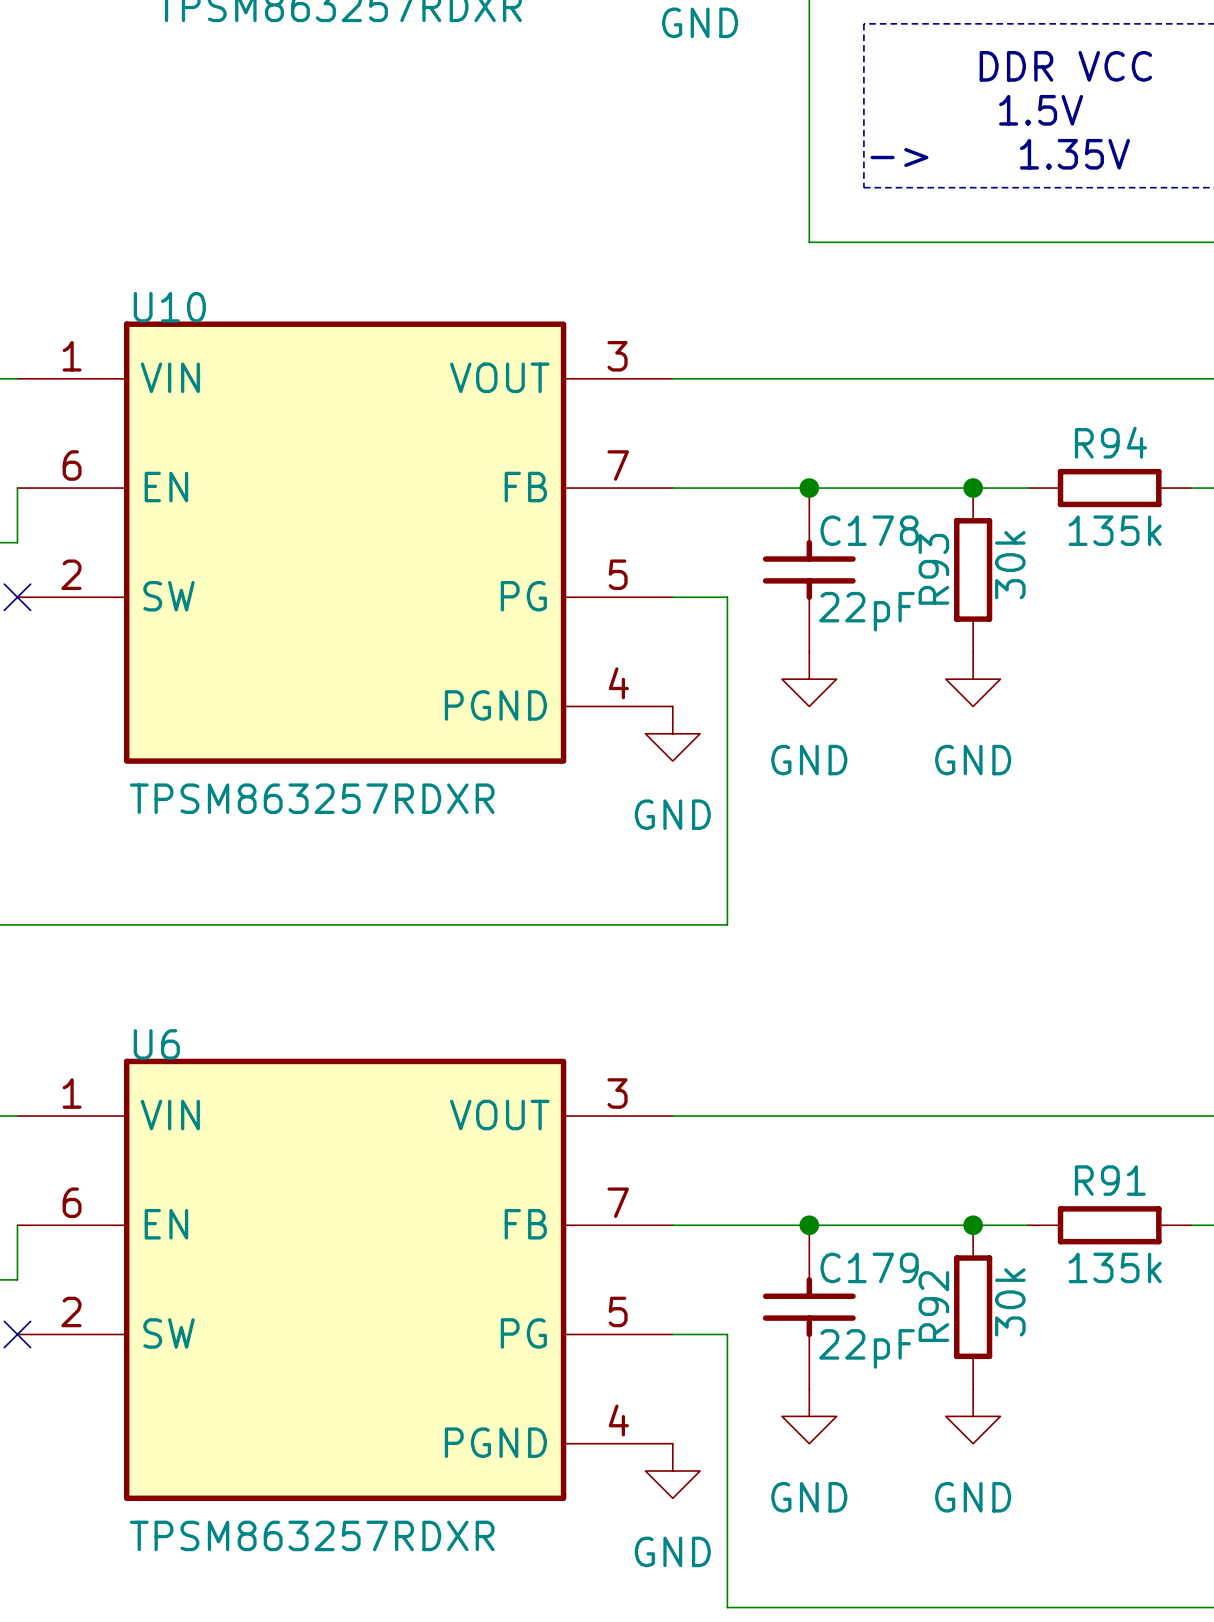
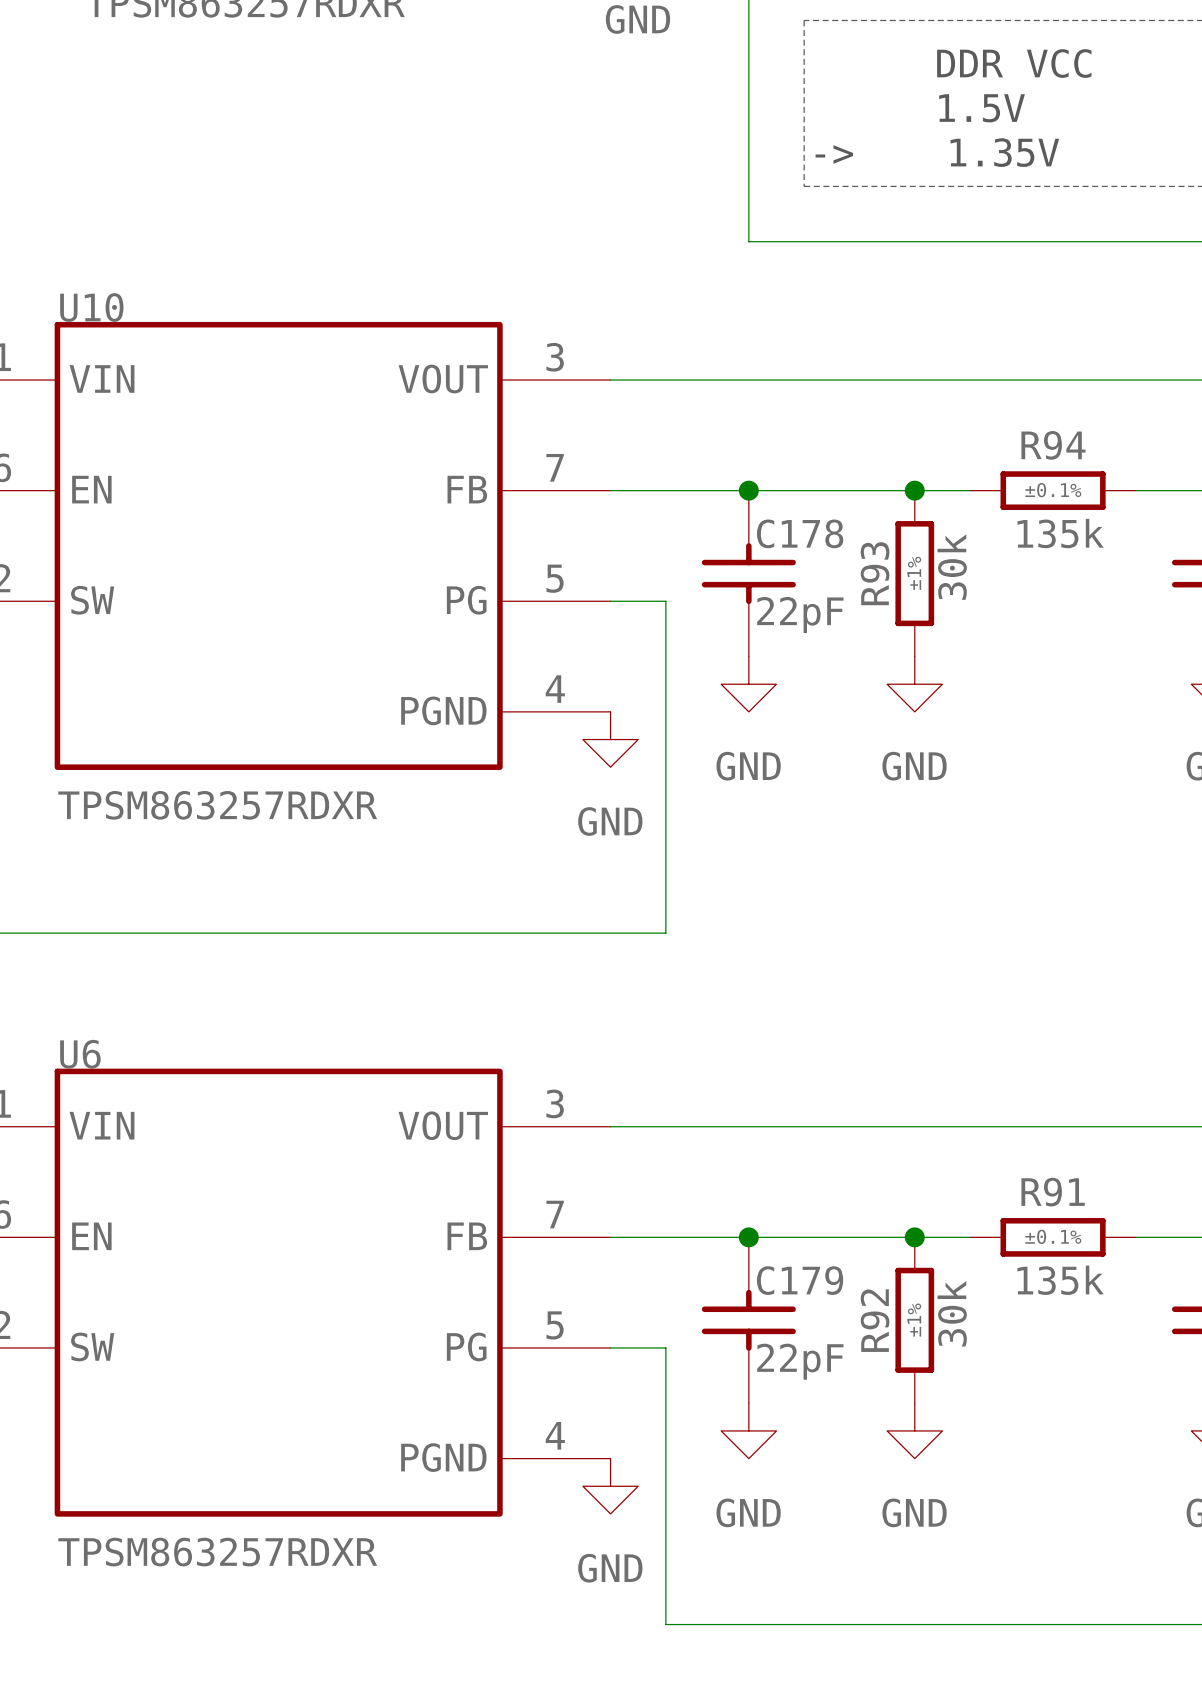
R94 text: none -> ±0.1% (1053, 490)
R93 text: none -> ±1% (914, 573)
R91 text: none -> ±0.1% (1053, 1236)
R92 text: none -> ±1% (914, 1320)

